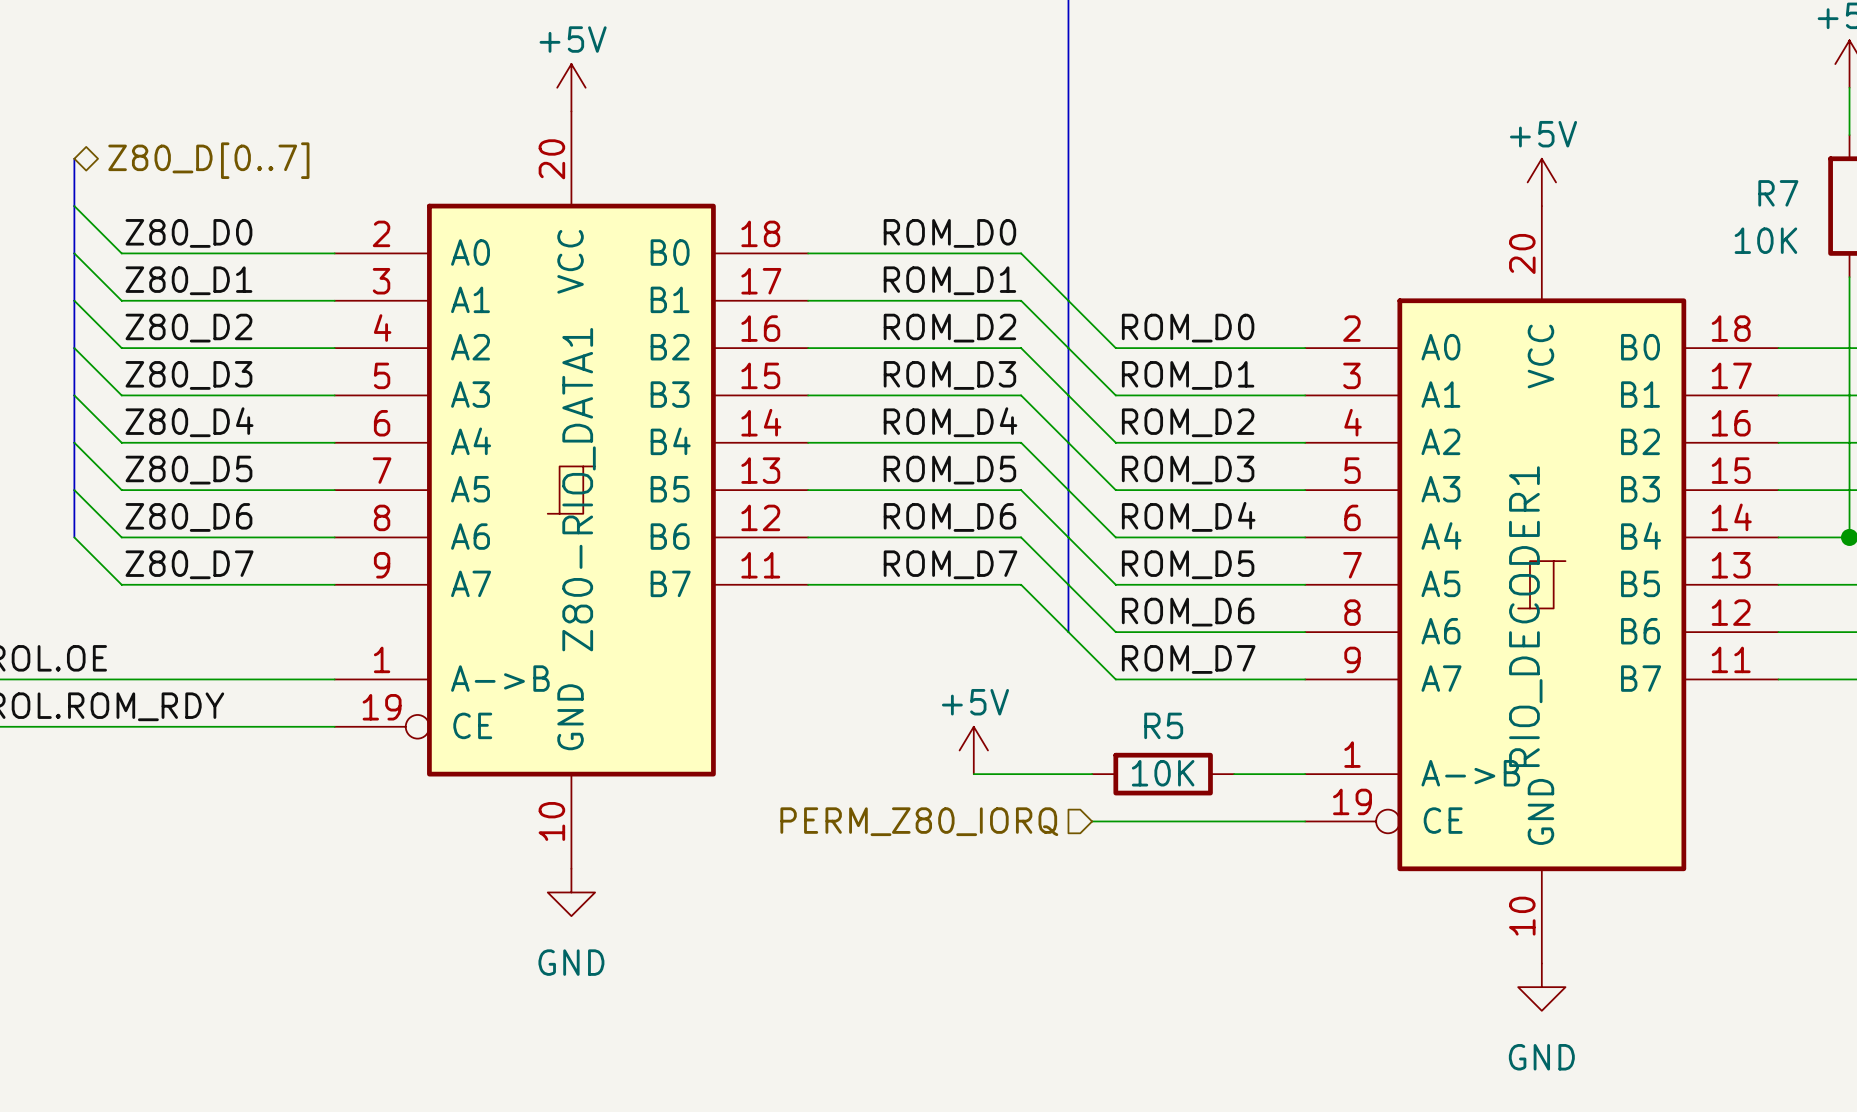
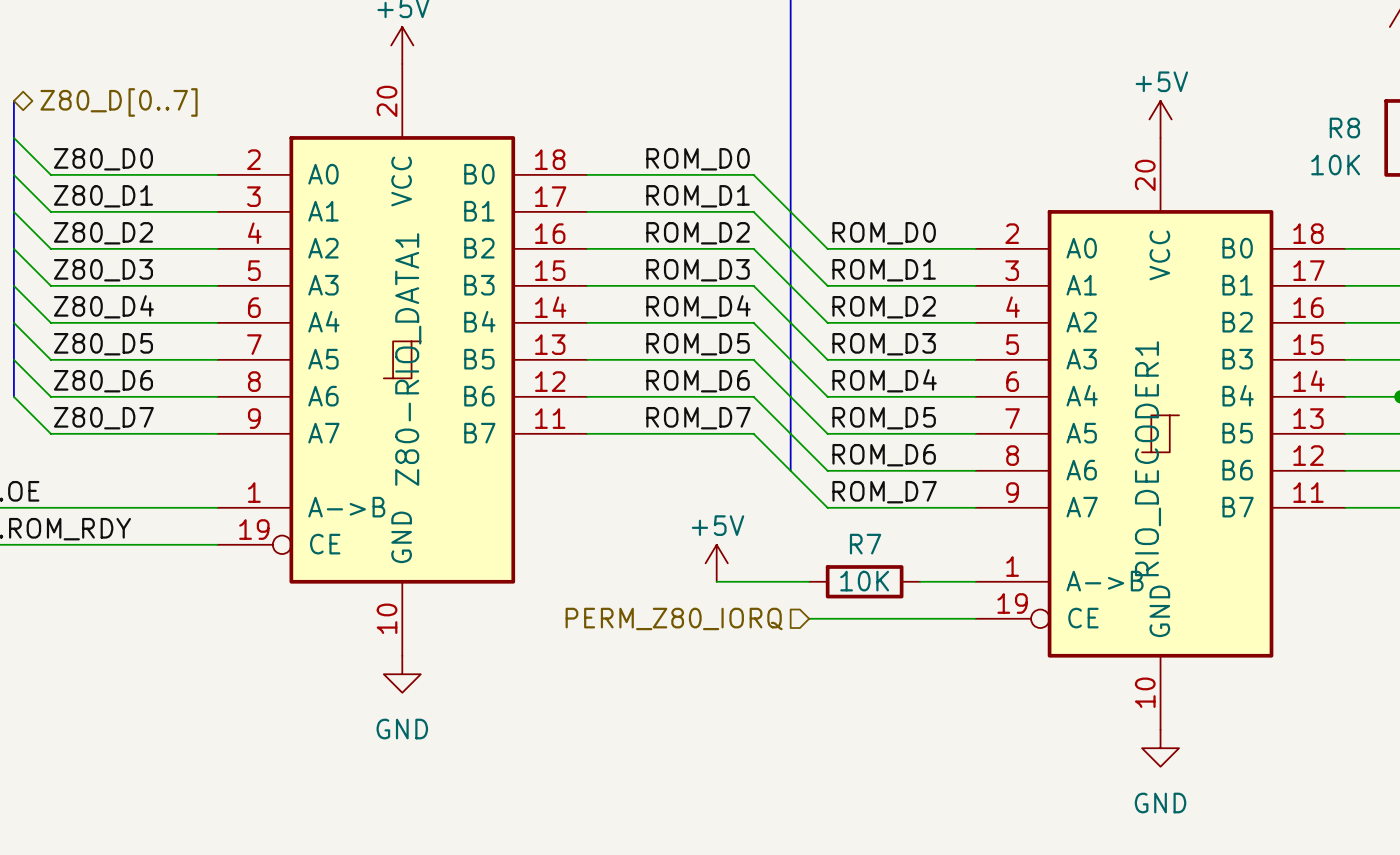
R7 name: R7 (1778, 193) -> R8 (1344, 128)
R5 name: R5 (1163, 725) -> R7 (865, 544)

